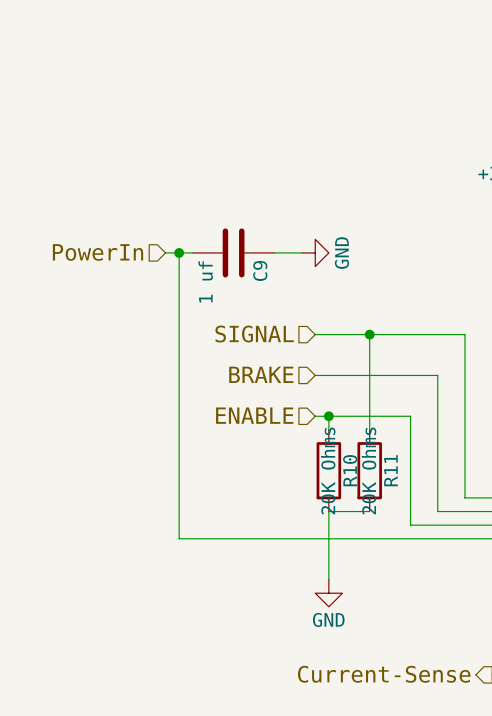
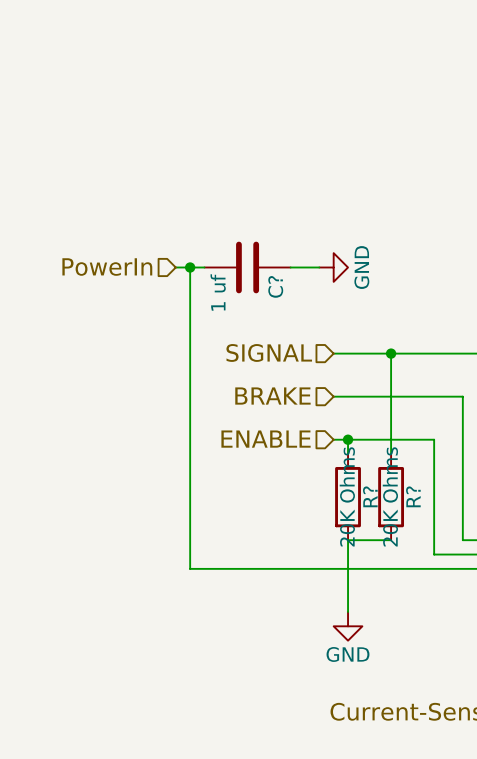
C9 name: C9 (260, 270) -> C? (275, 286)
R10 name: R10 (350, 470) -> R? (370, 496)
R11 name: R11 (390, 470) -> R? (413, 496)

